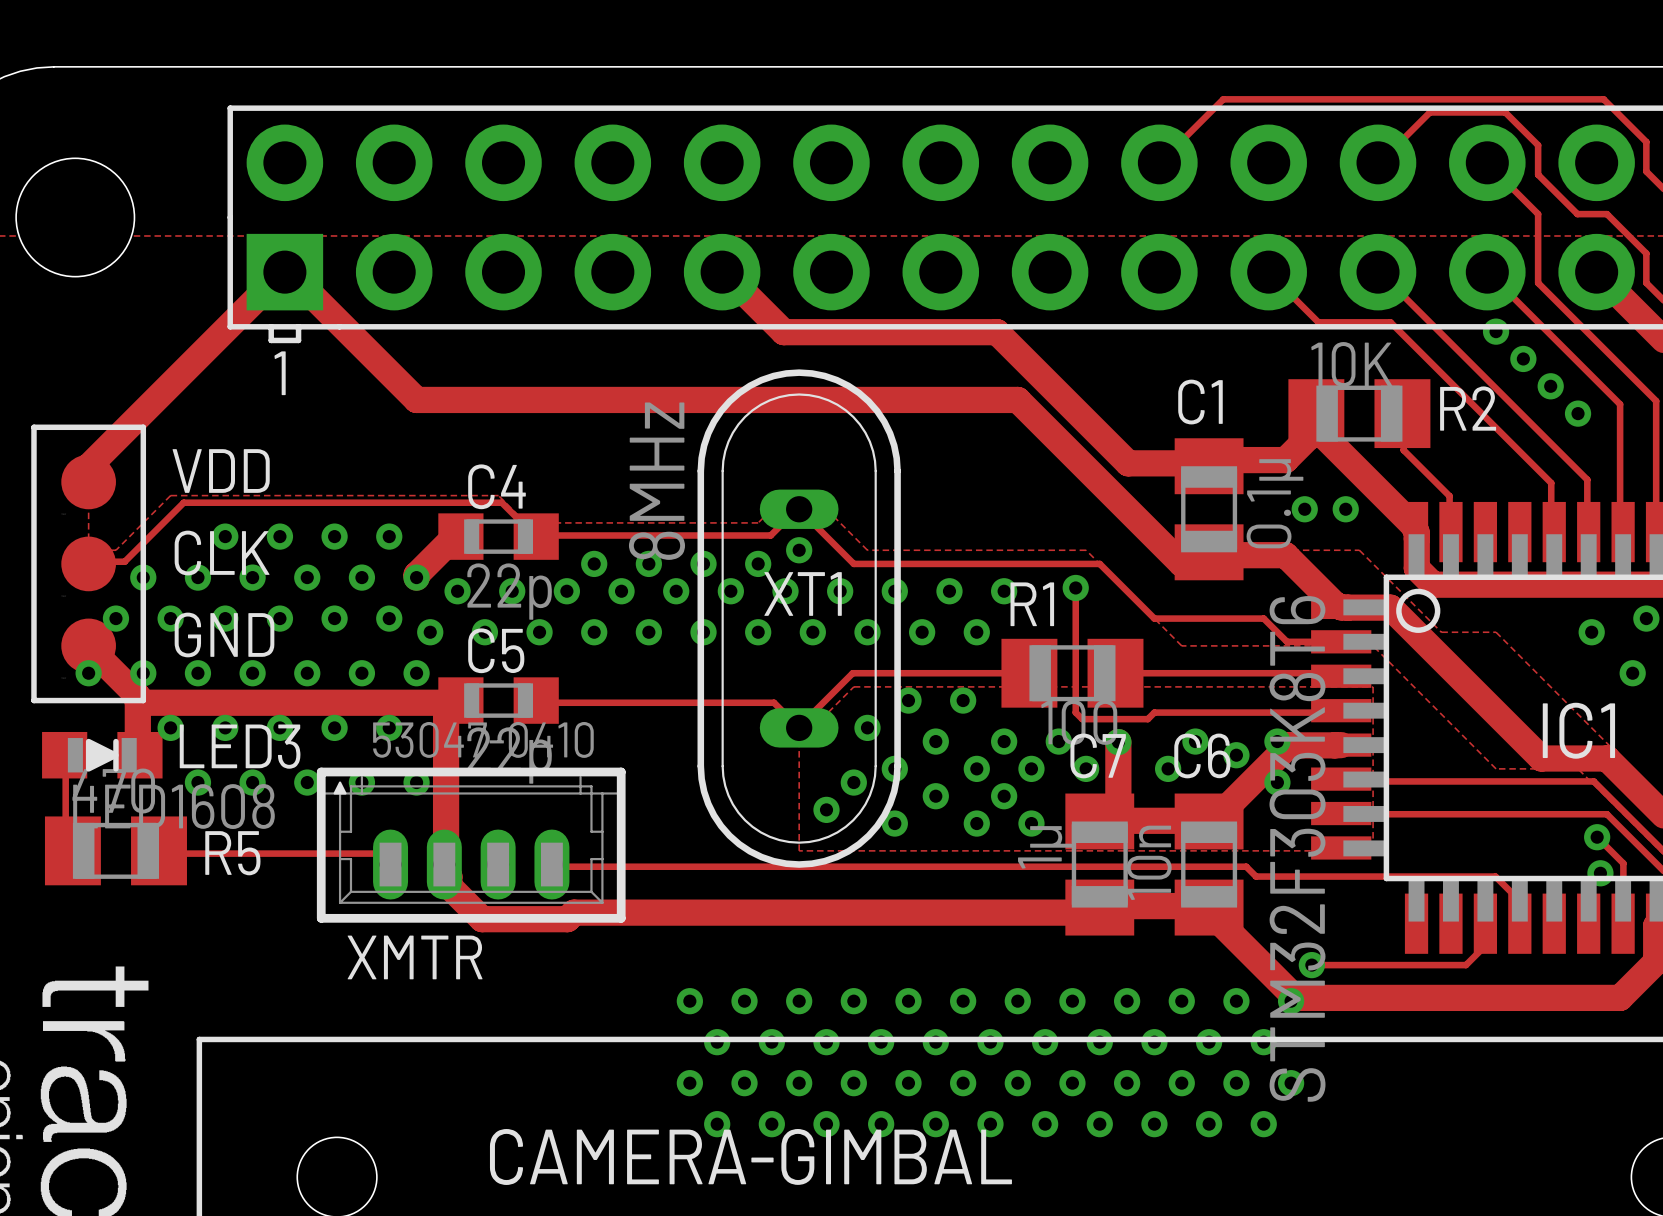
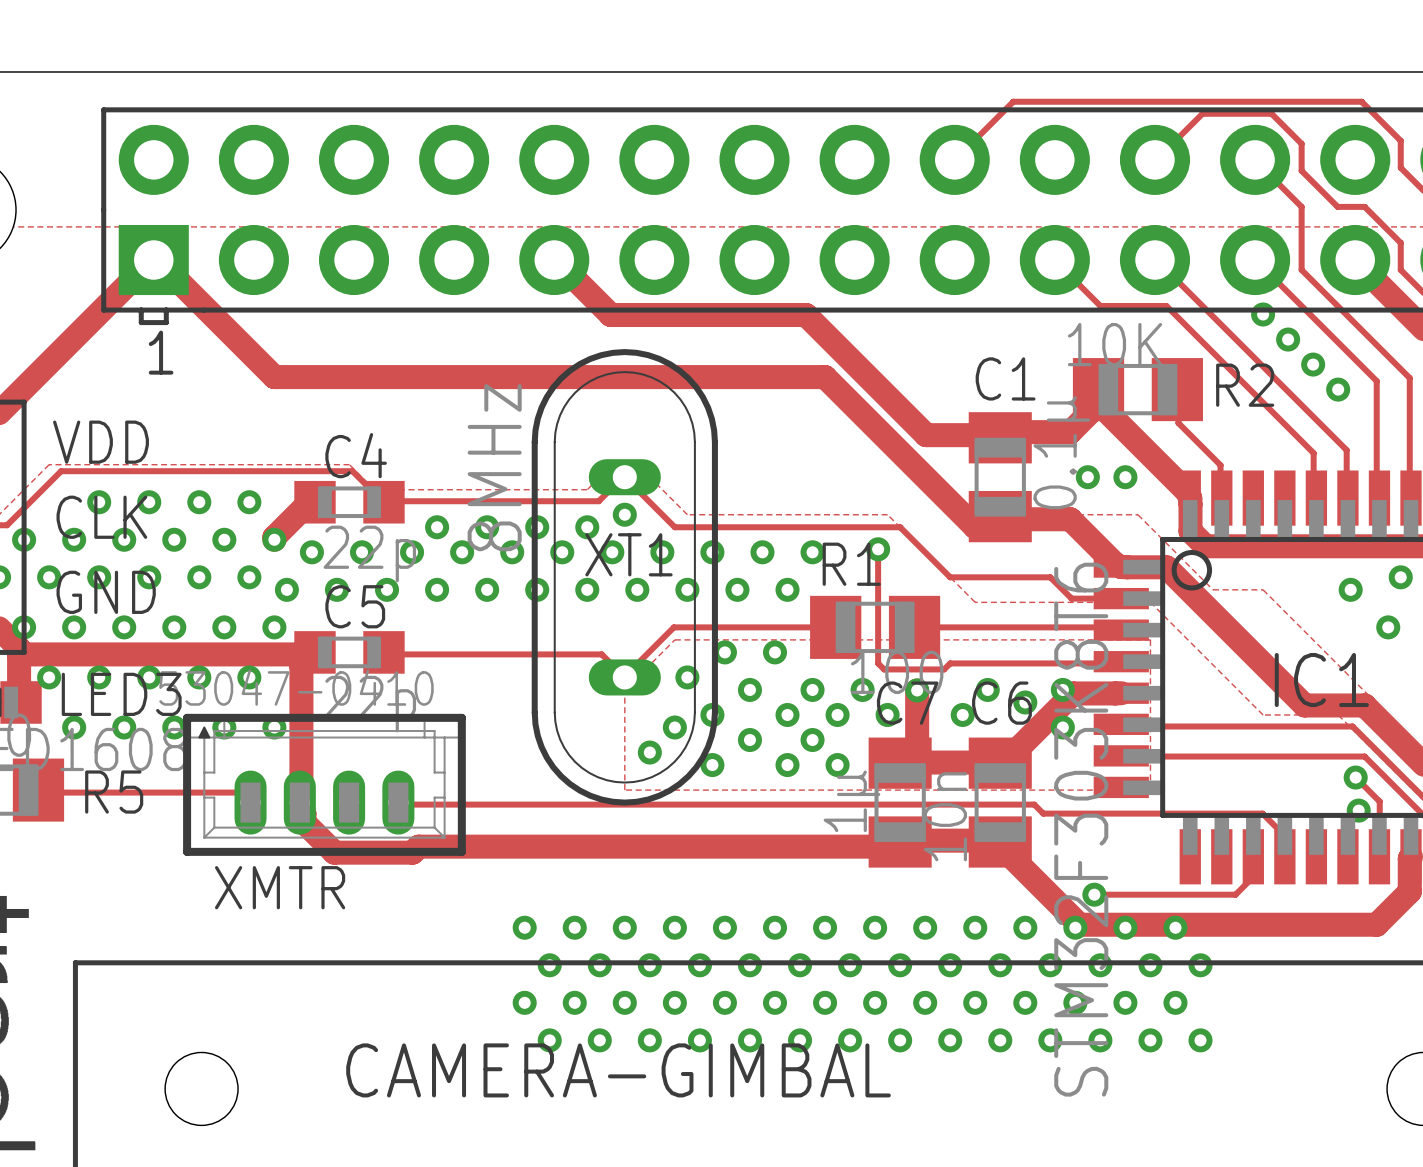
via: none -> (1125, 927)
via: none -> (1175, 927)
via: none -> (1100, 965)
via: none -> (1150, 965)
via: none -> (1200, 965)
via: none -> (1125, 1002)
via: none -> (1175, 1002)
via: none -> (1100, 1040)
via: none -> (1150, 1040)
via: none -> (1200, 1040)

